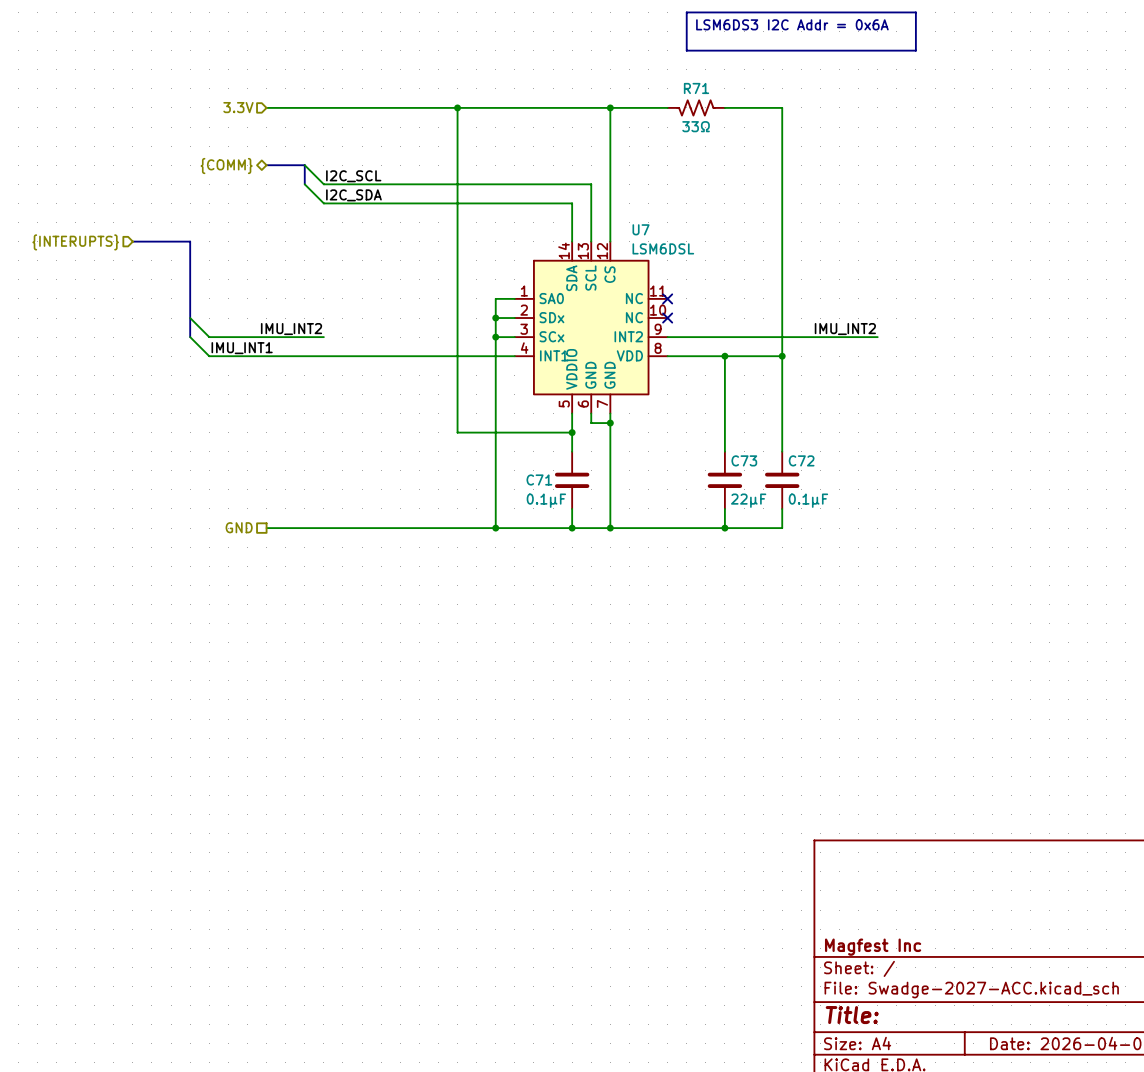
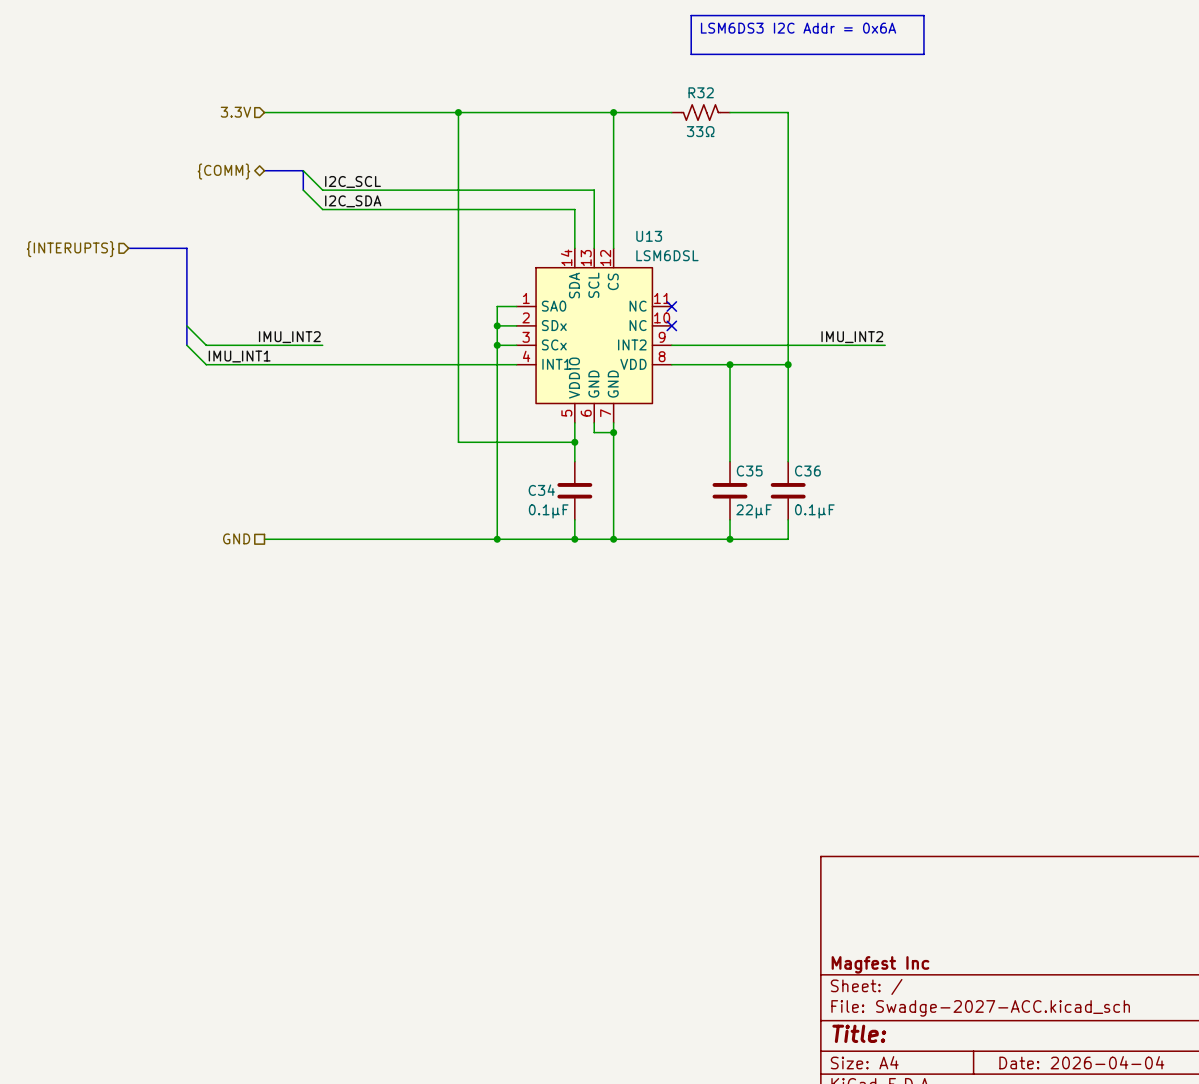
R71 name: R71 (696, 88) -> R32 (701, 92)
U7 name: U7 (641, 229) -> U13 (649, 236)
C73 name: C73 (744, 460) -> C35 (749, 471)
C72 name: C72 (801, 460) -> C36 (807, 471)
C71 name: C71 (539, 479) -> C34 (541, 490)

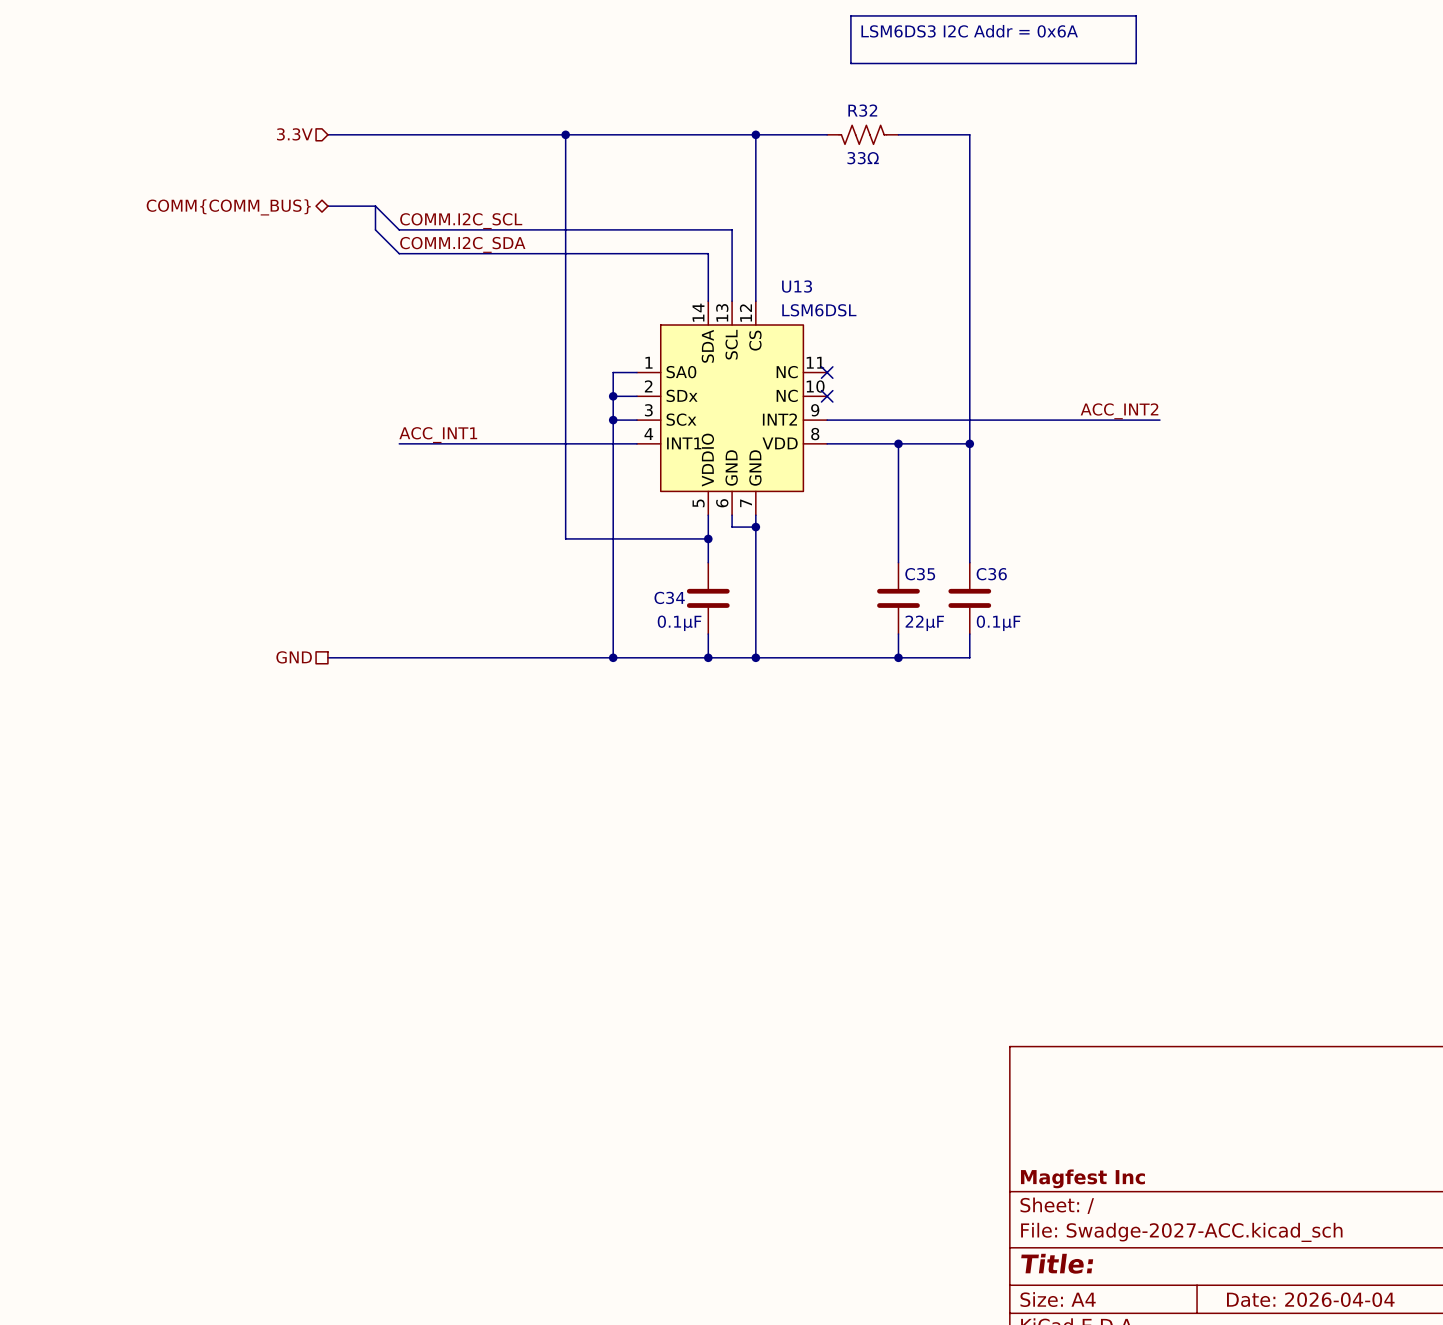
hierarchical label: {COMM} (223, 171) -> COMM{COMM_BUS} (228, 207)
label: I2C_SCL (353, 181) -> COMM.I2C_SCL (461, 221)
label: I2C_SDA (353, 201) -> COMM.I2C_SDA (462, 244)
bus: (128, 248) (186, 248) (186, 345) -> none
hierarchical label: {INTERUPTS} (70, 249) -> none
wire: (186, 325) (206, 345) (322, 345) -> none
label: IMU_INT2 (289, 337) -> none
label: IMU_INT2 (852, 337) -> ACC_INT2 (1119, 411)
wire: (186, 345) (206, 364) (322, 364) -> none
wire: none -> (1088, 420) (1159, 420)
label: IMU_INT1 (239, 356) -> none
label: none -> ACC_INT1 (438, 435)

